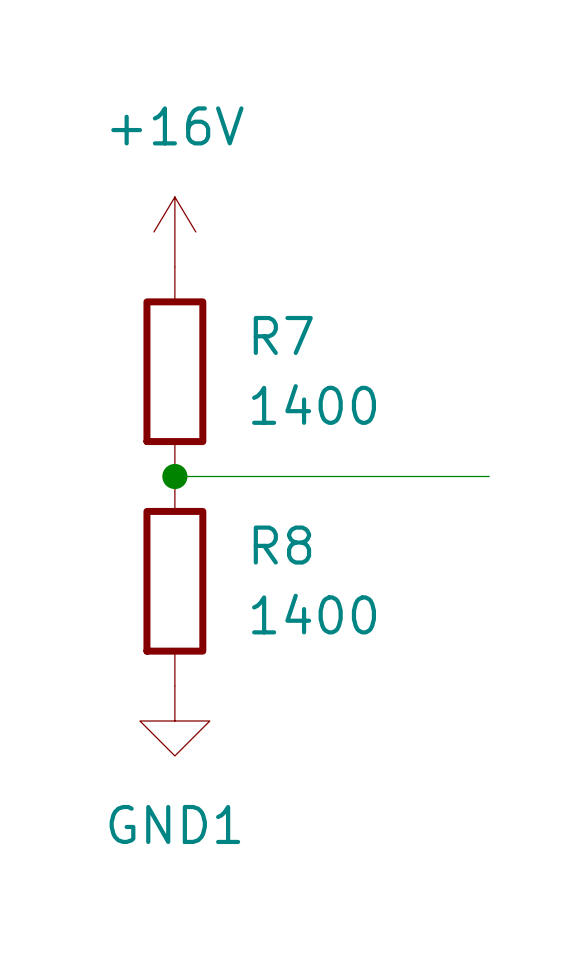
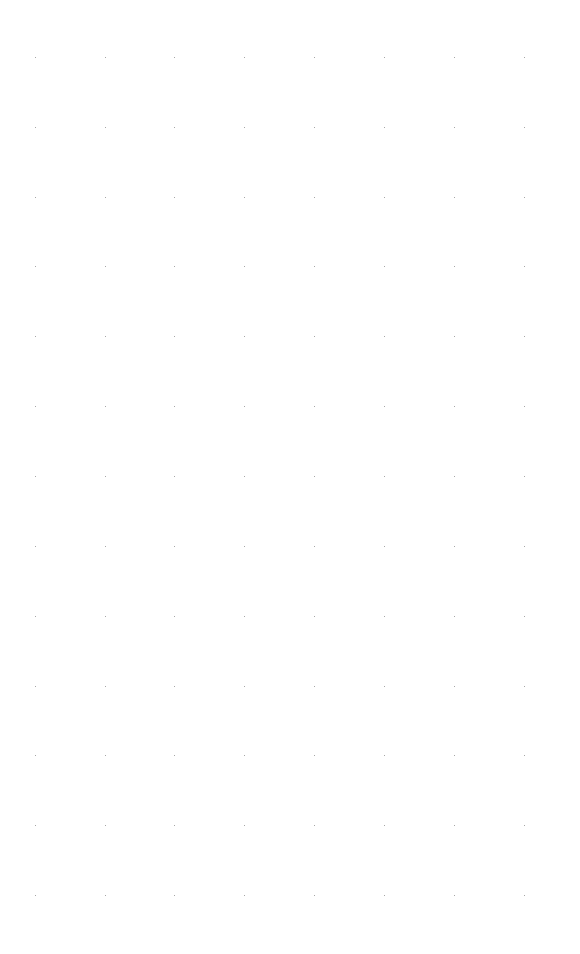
power symbol: +16V (174, 231) -> none
R7: 1400 (174, 371) -> none
wire: (174, 476) (489, 476) -> none
junction: (174, 476) -> none
R8: 1400 (174, 581) -> none
power symbol: GND1 (174, 721) -> none

